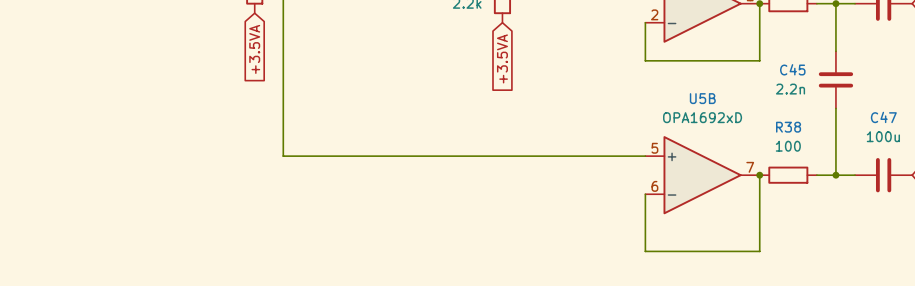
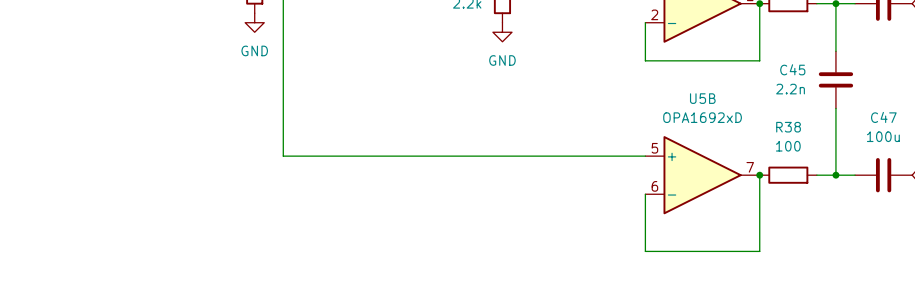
power symbol: none -> GND (254, 22)
power symbol: none -> GND (502, 32)
global label: +3.5VA (254, 49) -> none
global label: +3.5VA (502, 58) -> none

